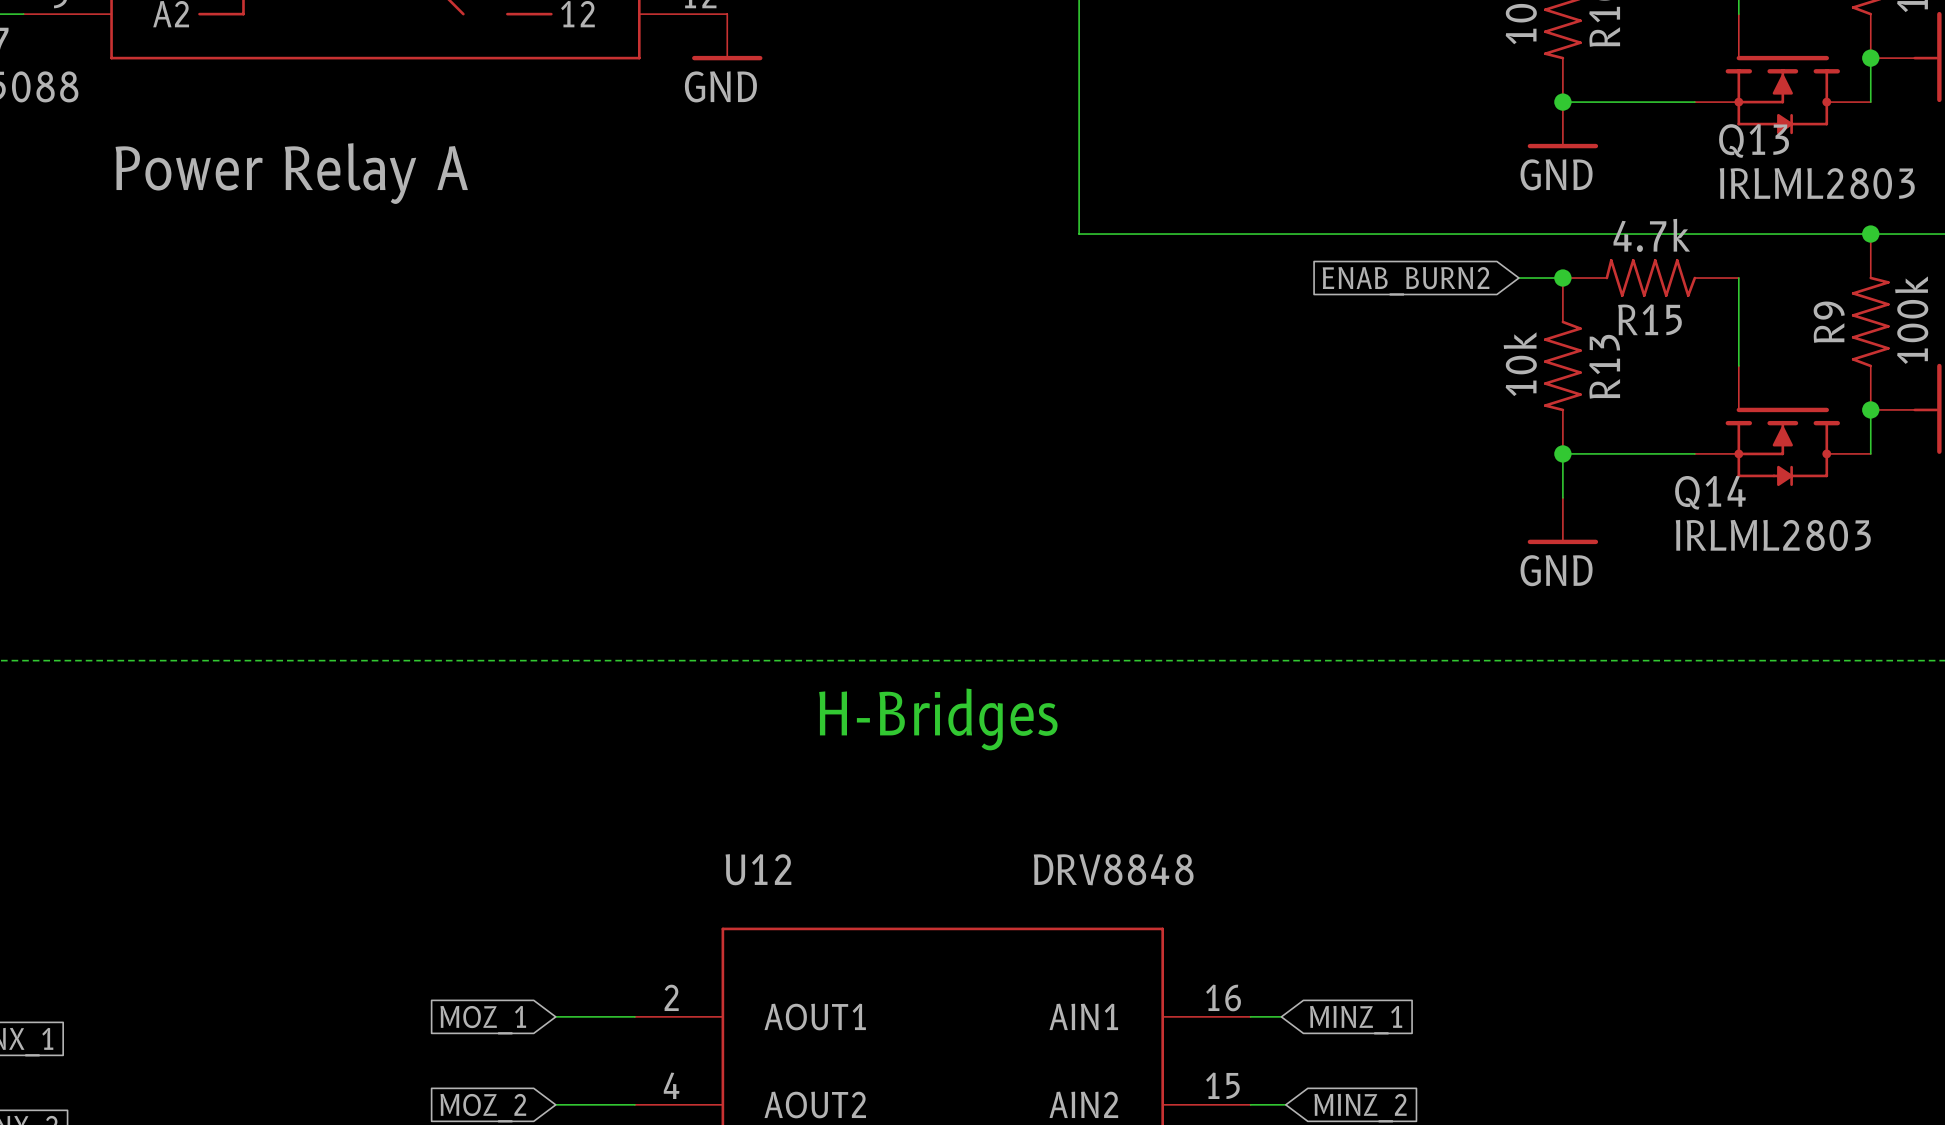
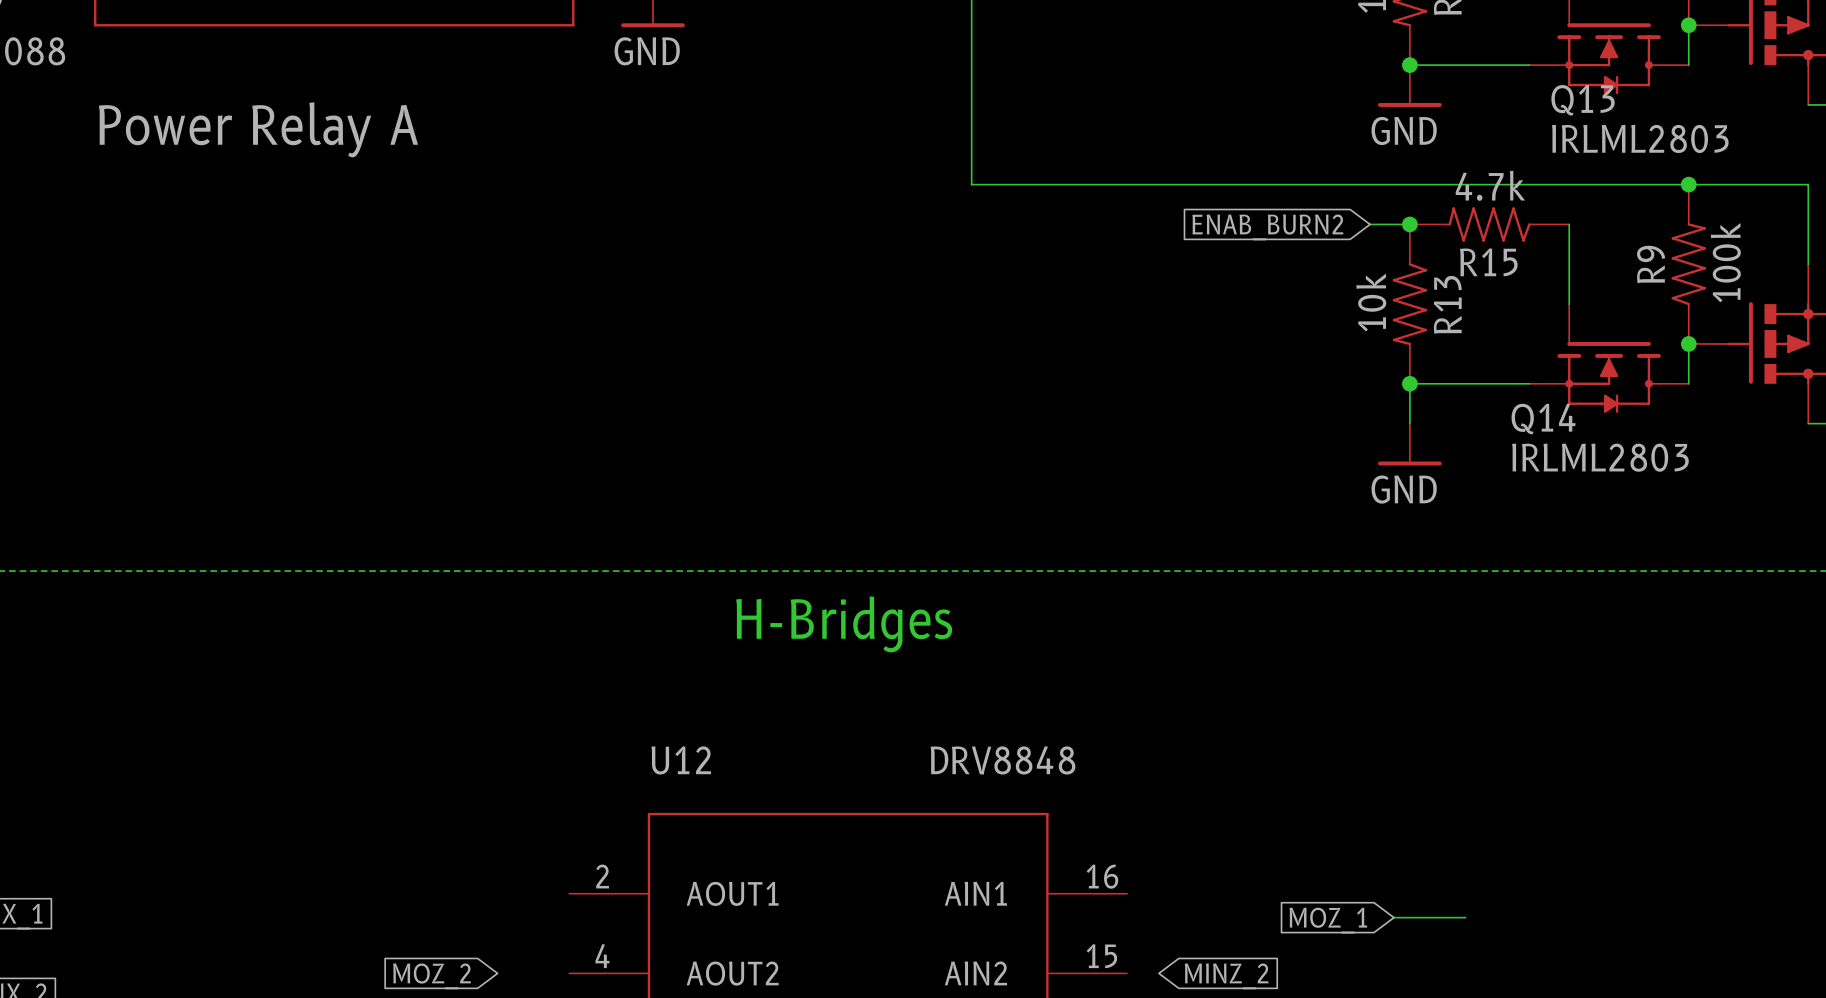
wire: (555, 1016) (634, 1016) -> none
wire: (1250, 1016) (1281, 1016) -> none
global label: MOZ_1 (483, 1020) -> none
global label: MINZ_1 (1356, 1020) -> MOZ_1 (1328, 920)
wire: none -> (1393, 917) (1465, 917)
wire: (555, 1104) (634, 1104) -> none
wire: (1250, 1104) (1285, 1104) -> none

